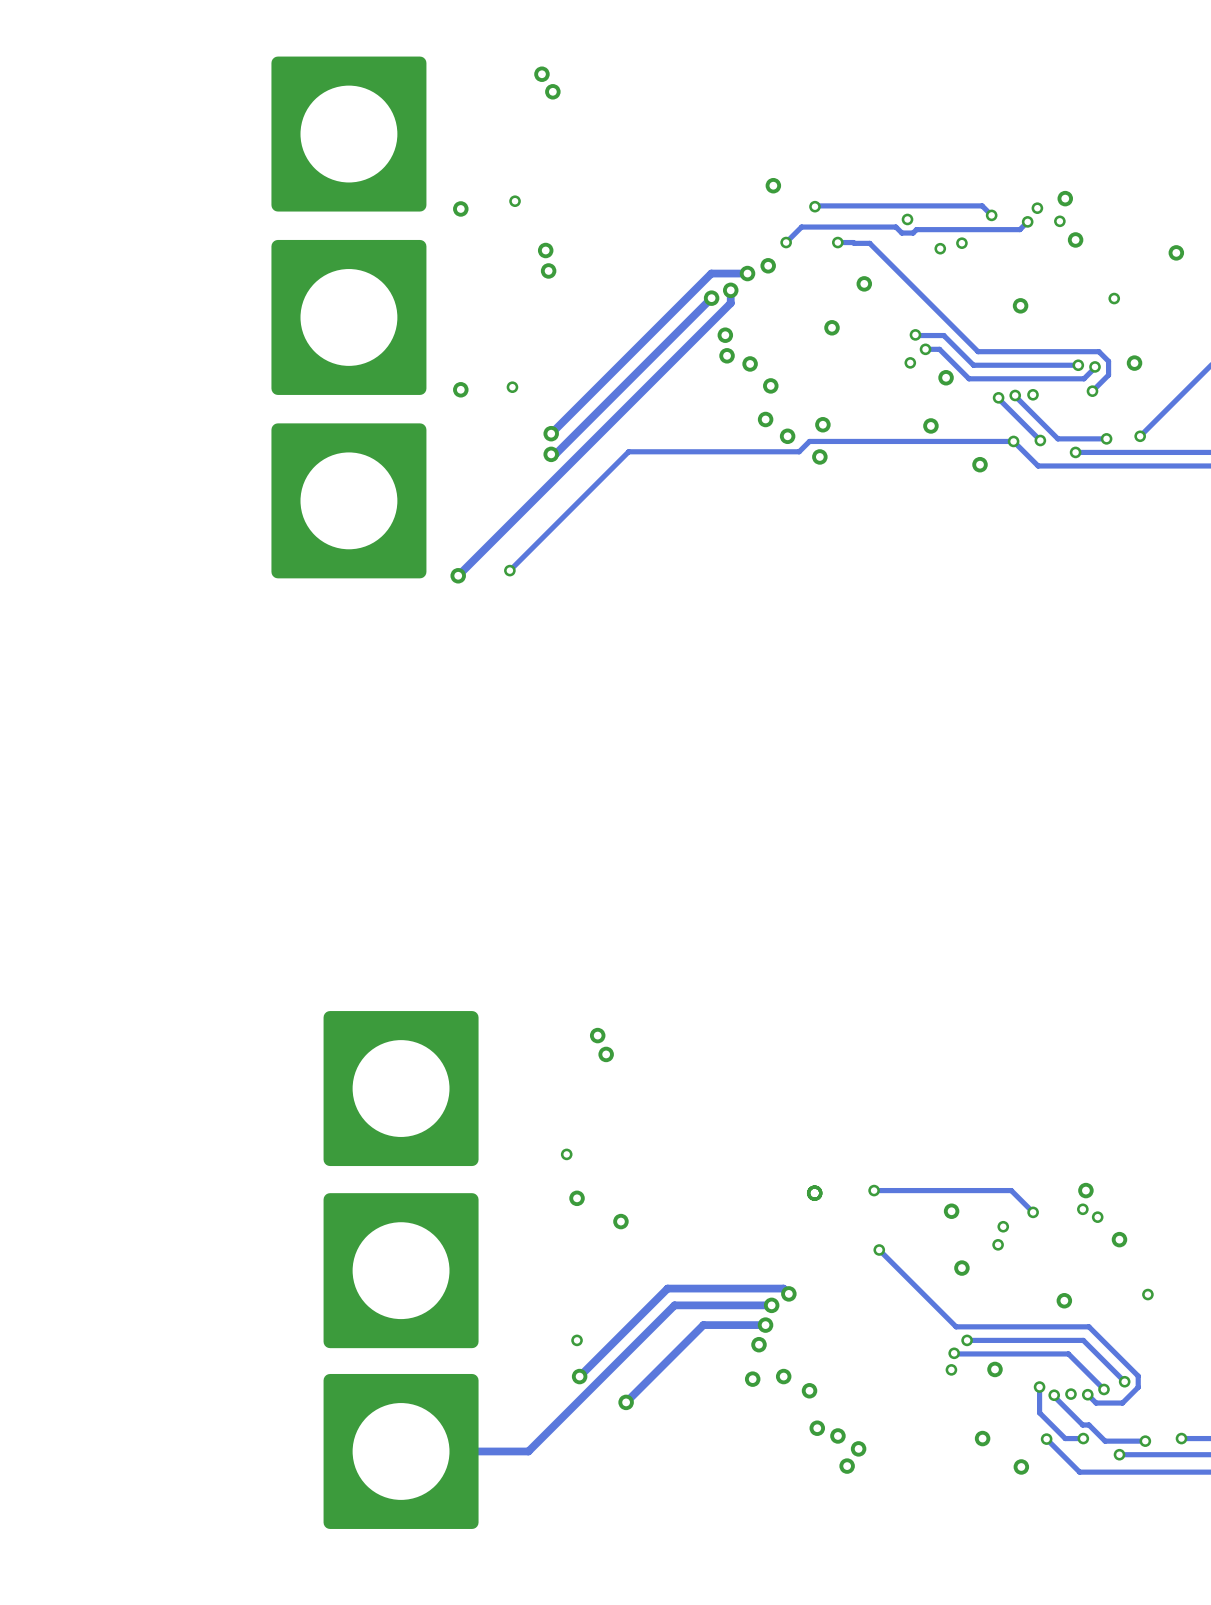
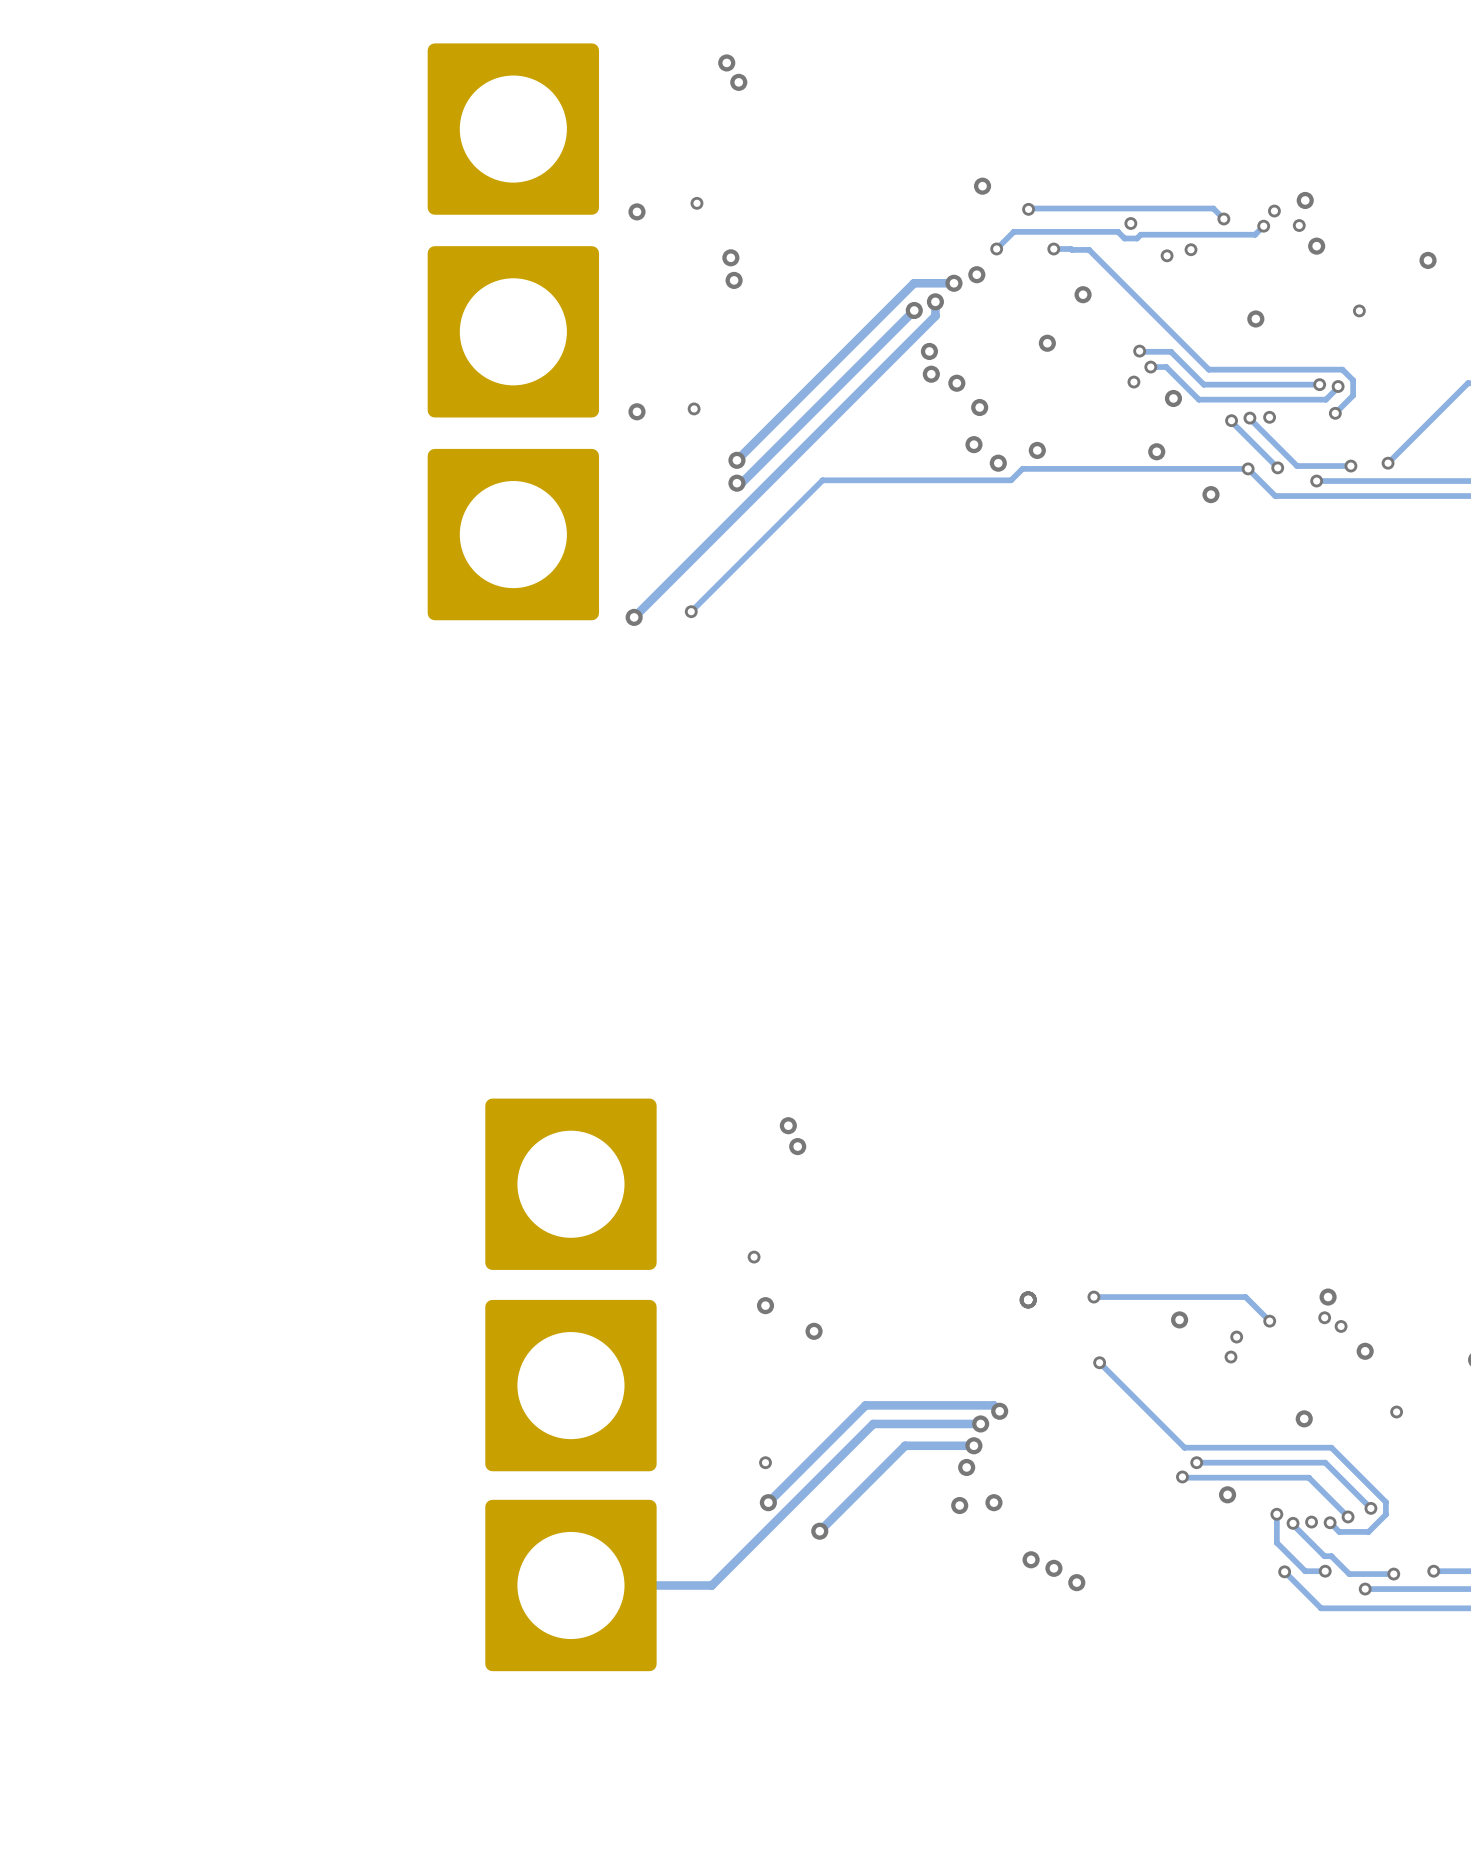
via: (1134, 363) -> none
via: (819, 456) -> none
via: (961, 1268) -> none
via: (951, 1369) -> none
via: (809, 1390) -> none
via: (982, 1438) -> none
via: (847, 1466) -> none
via: (1021, 1466) -> none

